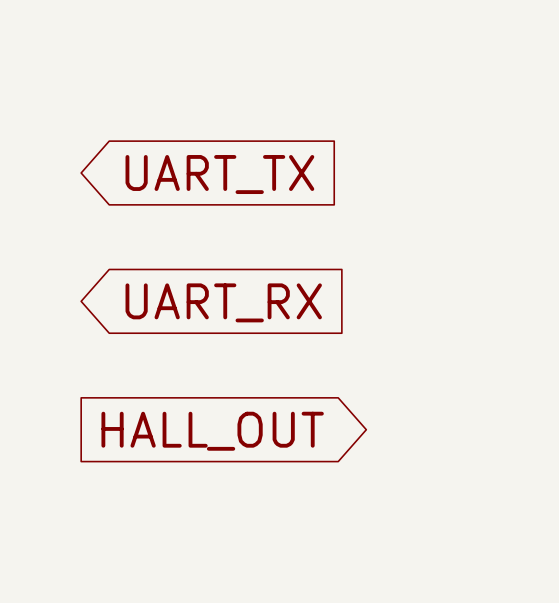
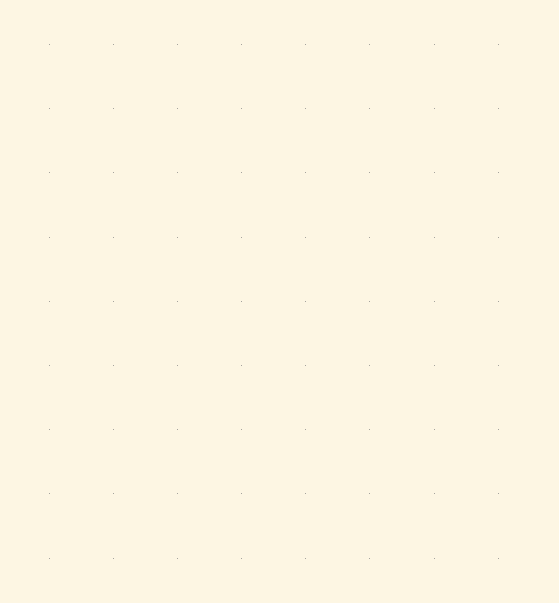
global label: UART_TX (219, 174) -> none
global label: UART_RX (223, 302) -> none
global label: HALL_OUT (212, 431) -> none

